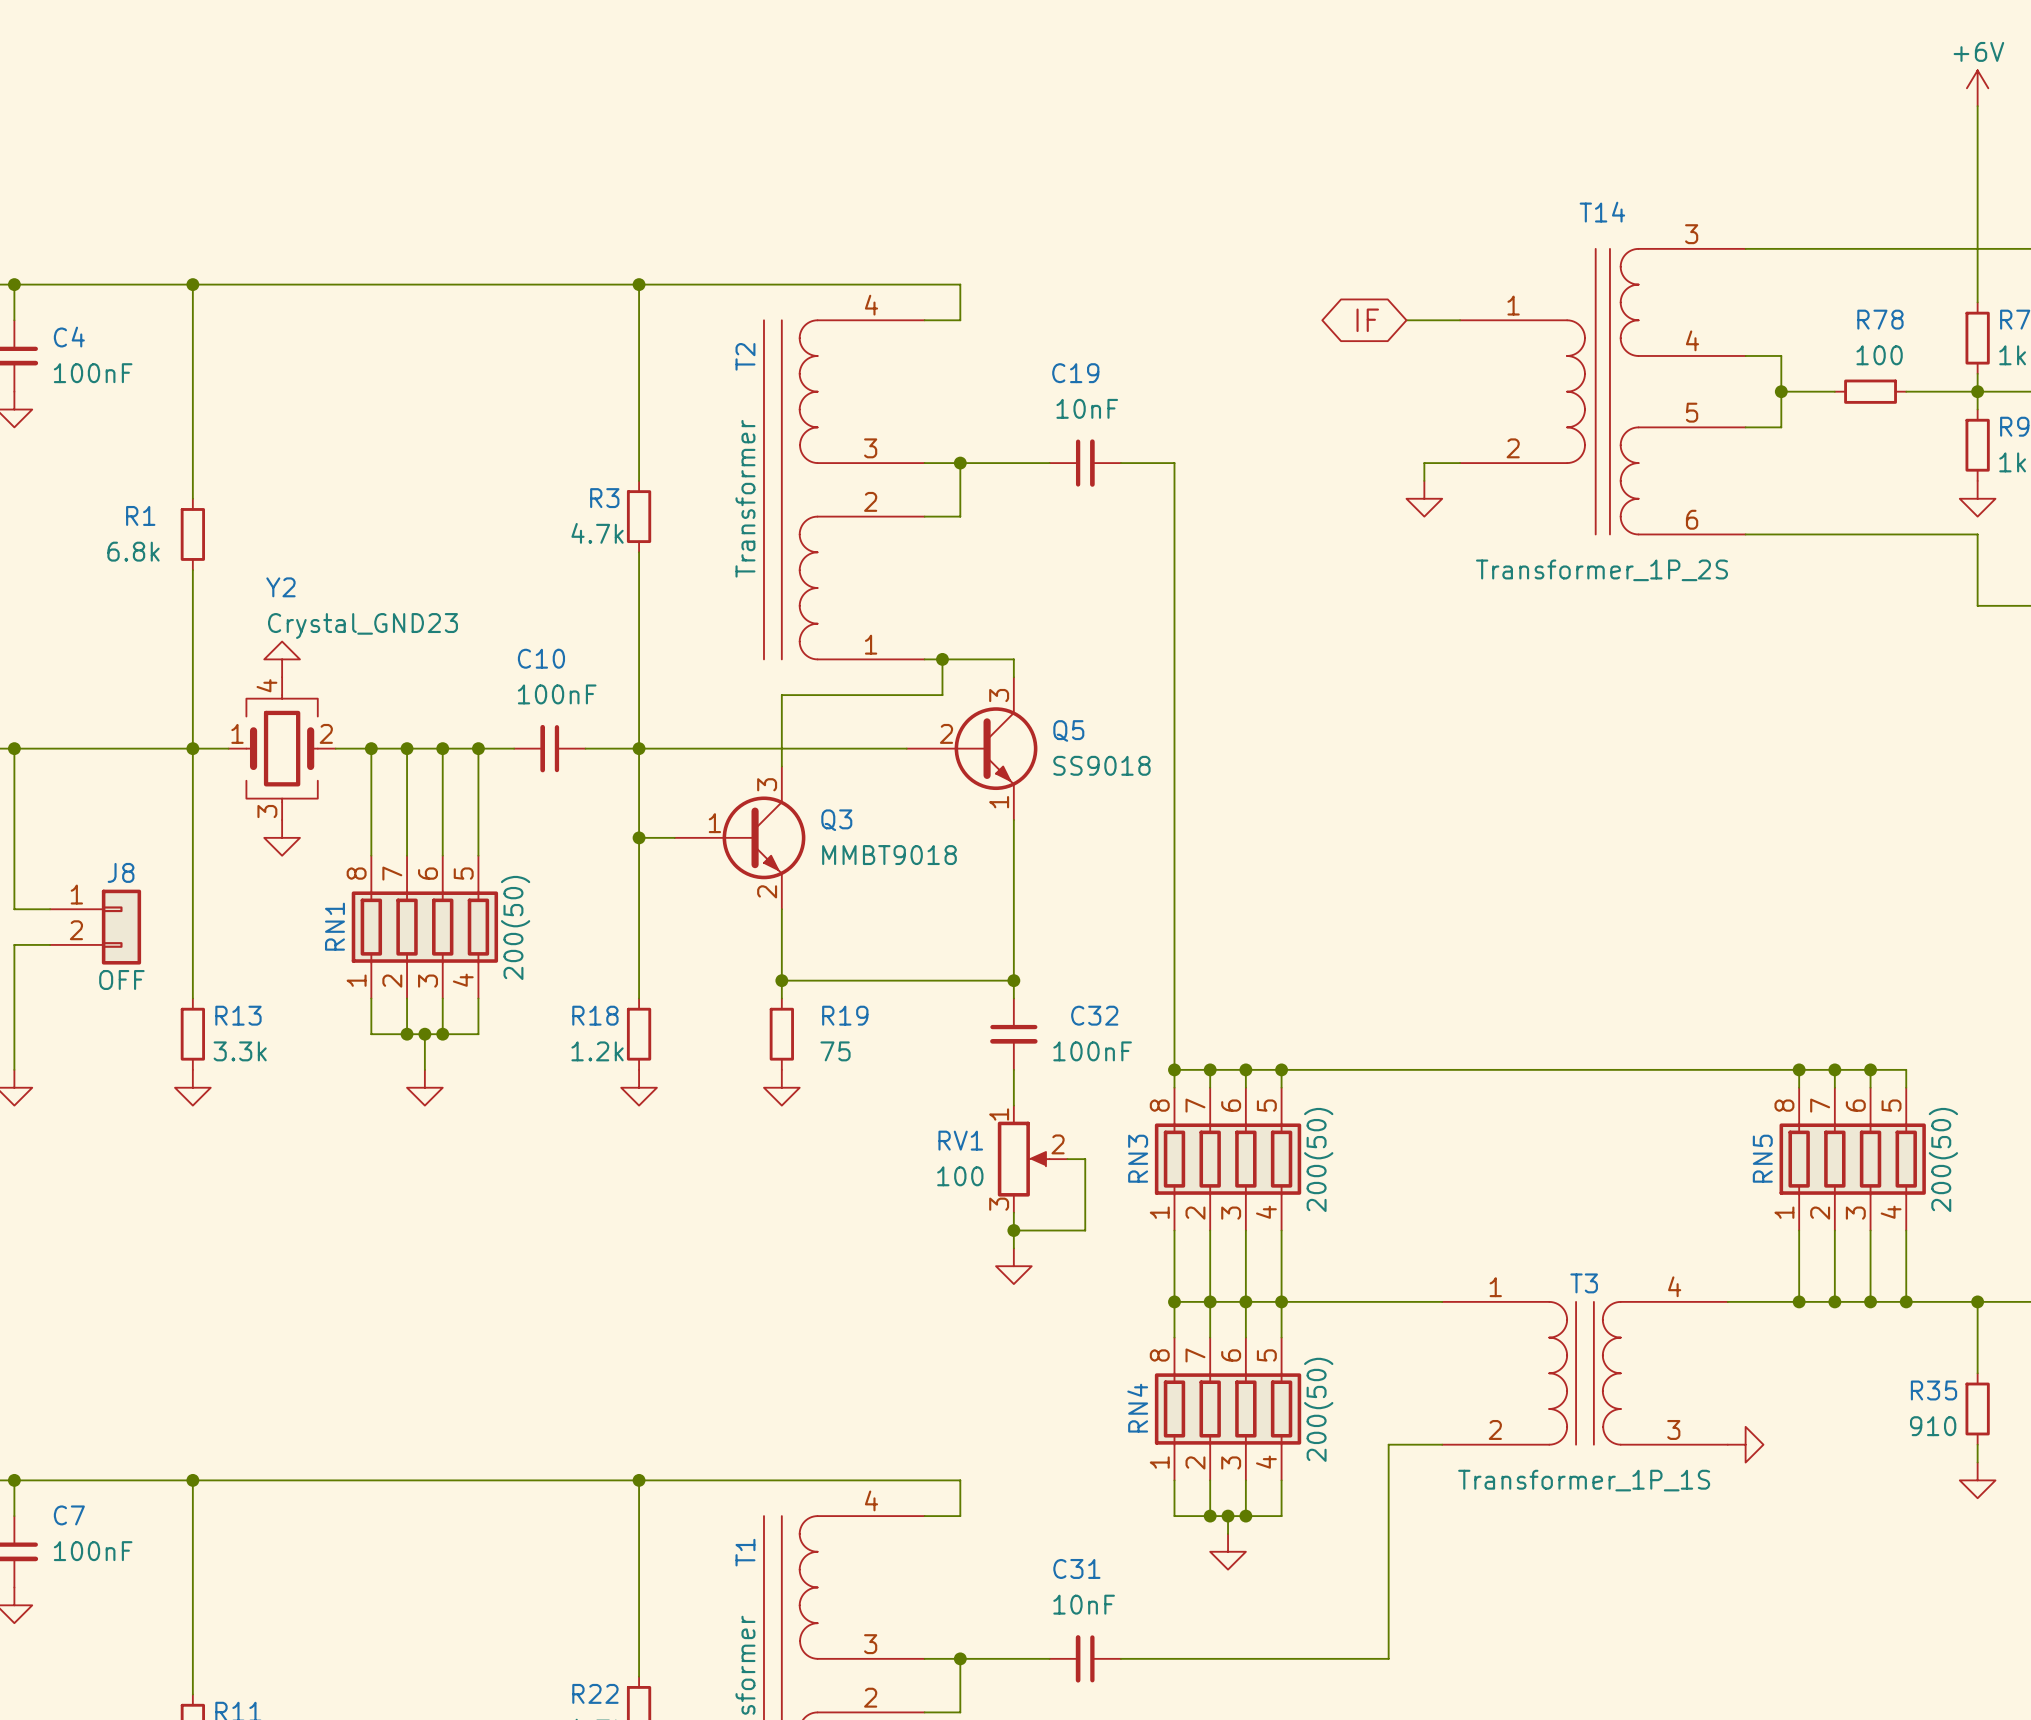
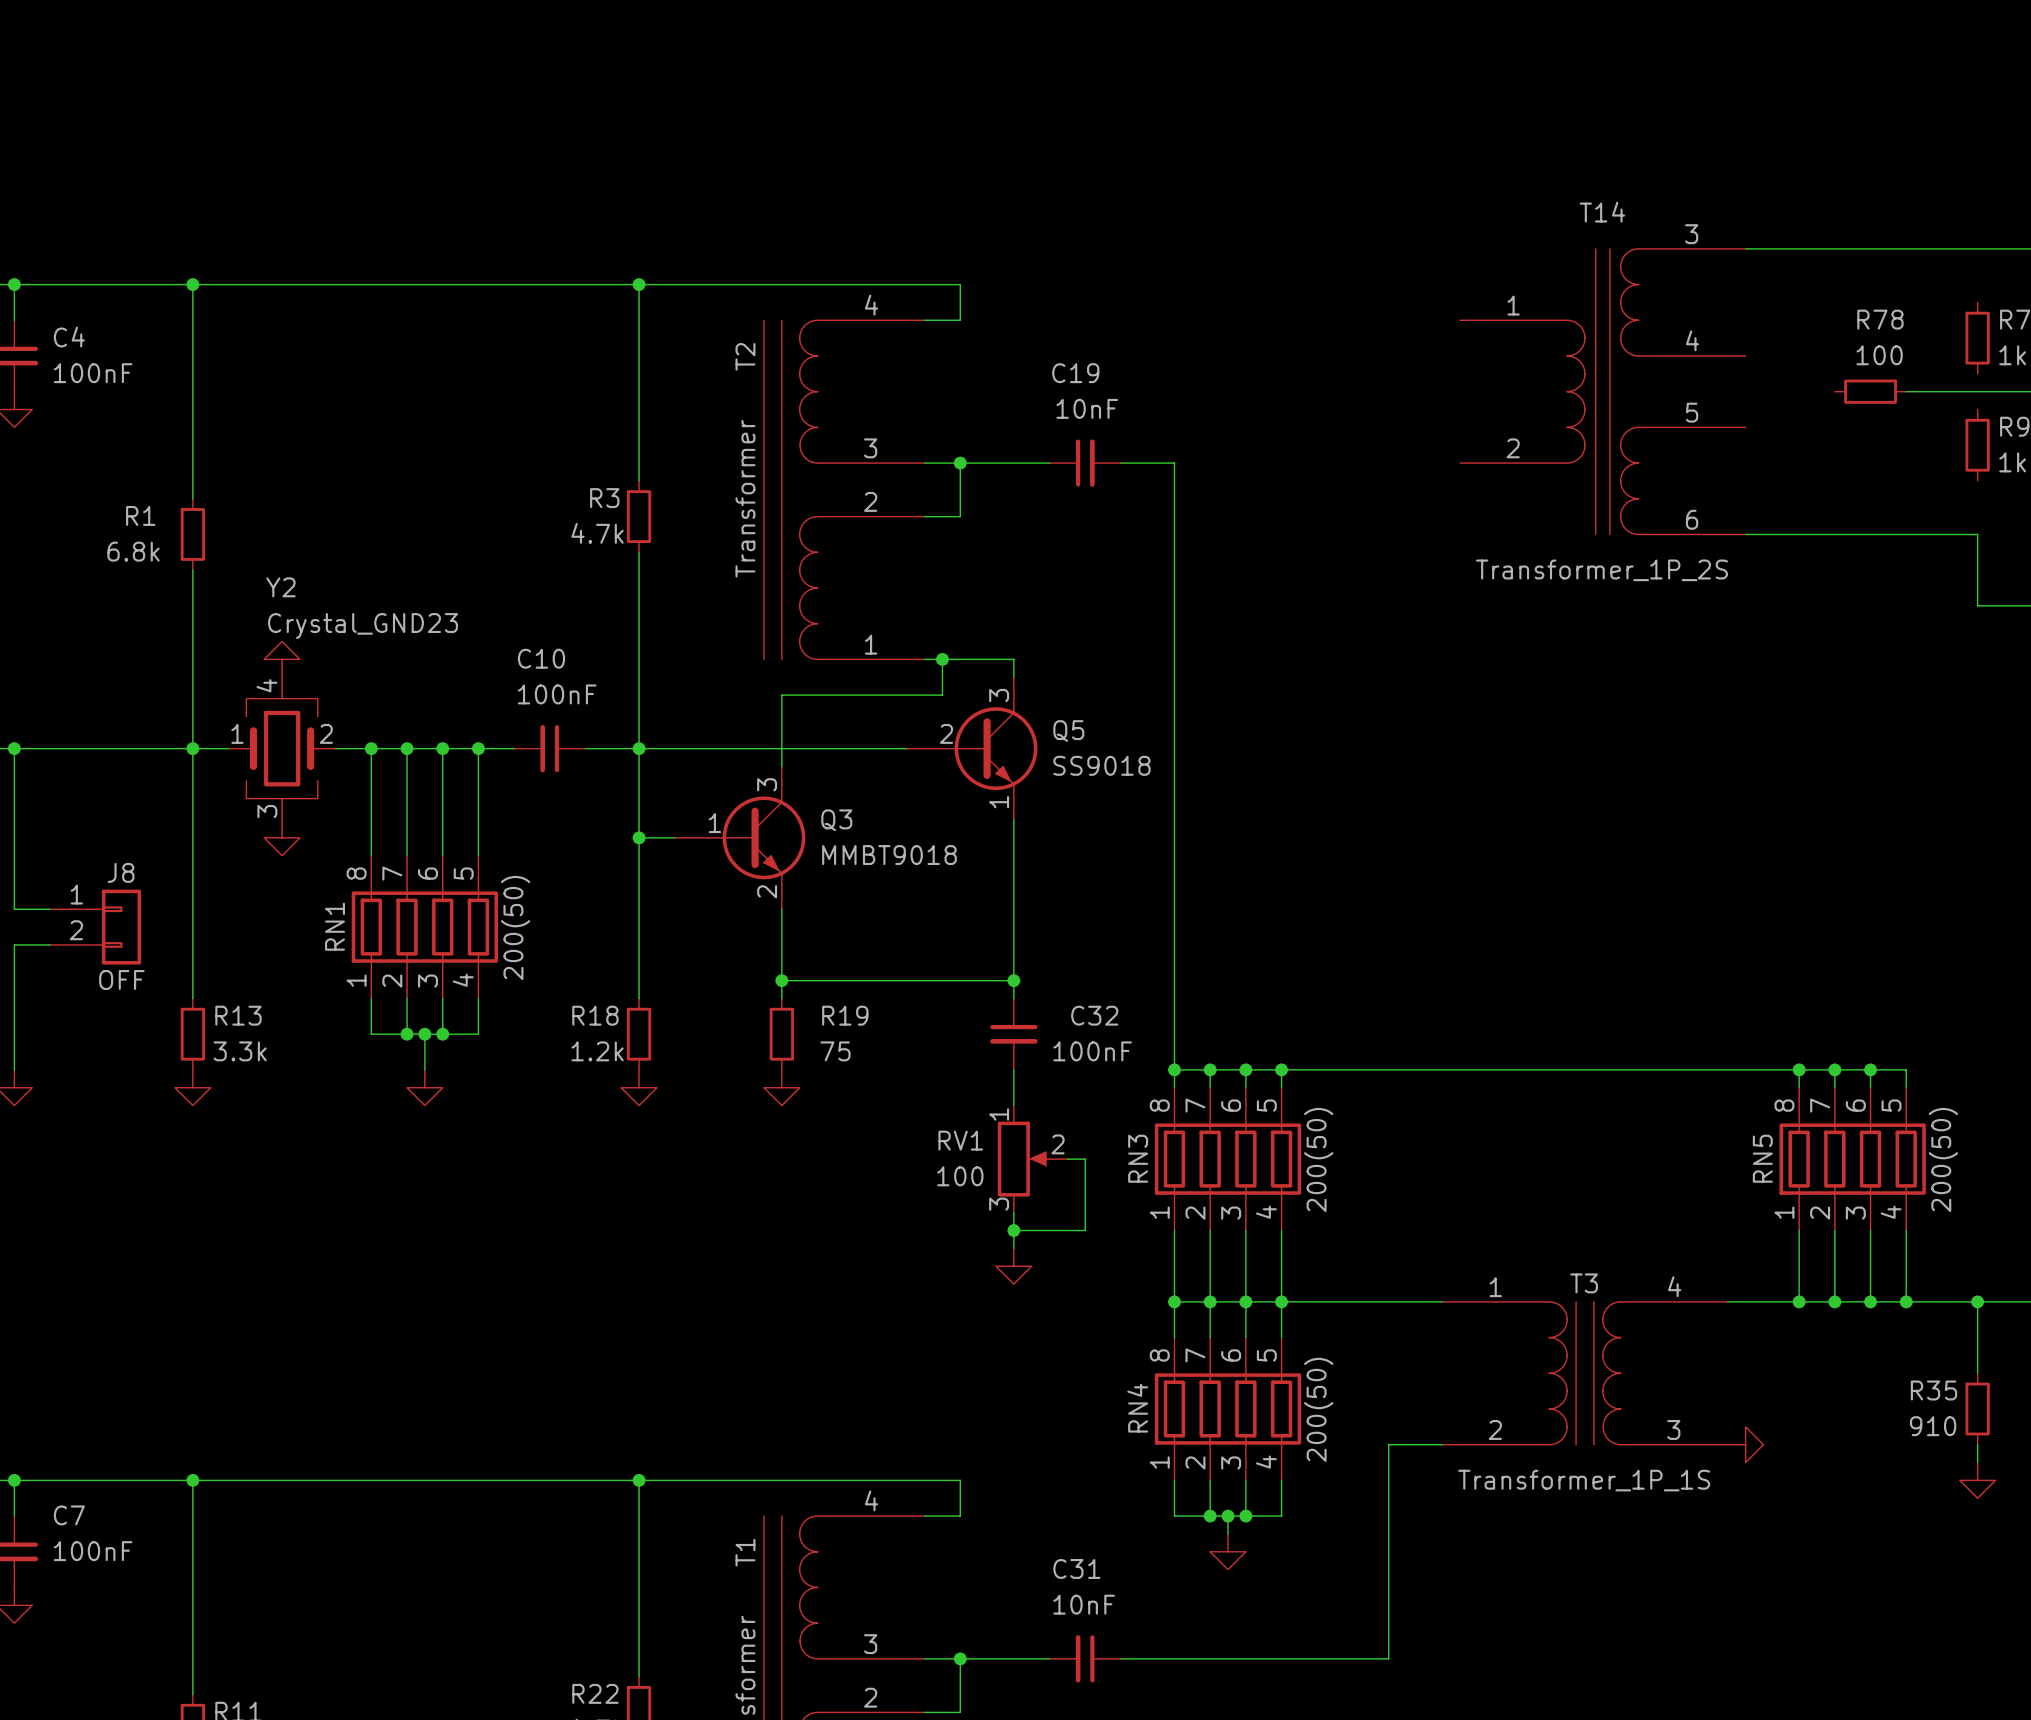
power symbol: +6V (1977, 88) -> none
wire: (1977, 106) (1977, 302) -> none
global label: IF (1367, 320) -> none
wire: (1406, 320) (1460, 320) -> none
wire: (1745, 355) (1781, 355) (1781, 427) (1745, 427) -> none
wire: (1977, 373) (1977, 409) -> none
wire: (1781, 391) (1834, 391) -> none
junction: (1781, 391) -> none
junction: (1977, 391) -> none
wire: (1460, 463) (1424, 463) (1424, 480) -> none
power symbol: (1424, 498) -> none
power symbol: (1977, 498) -> none

